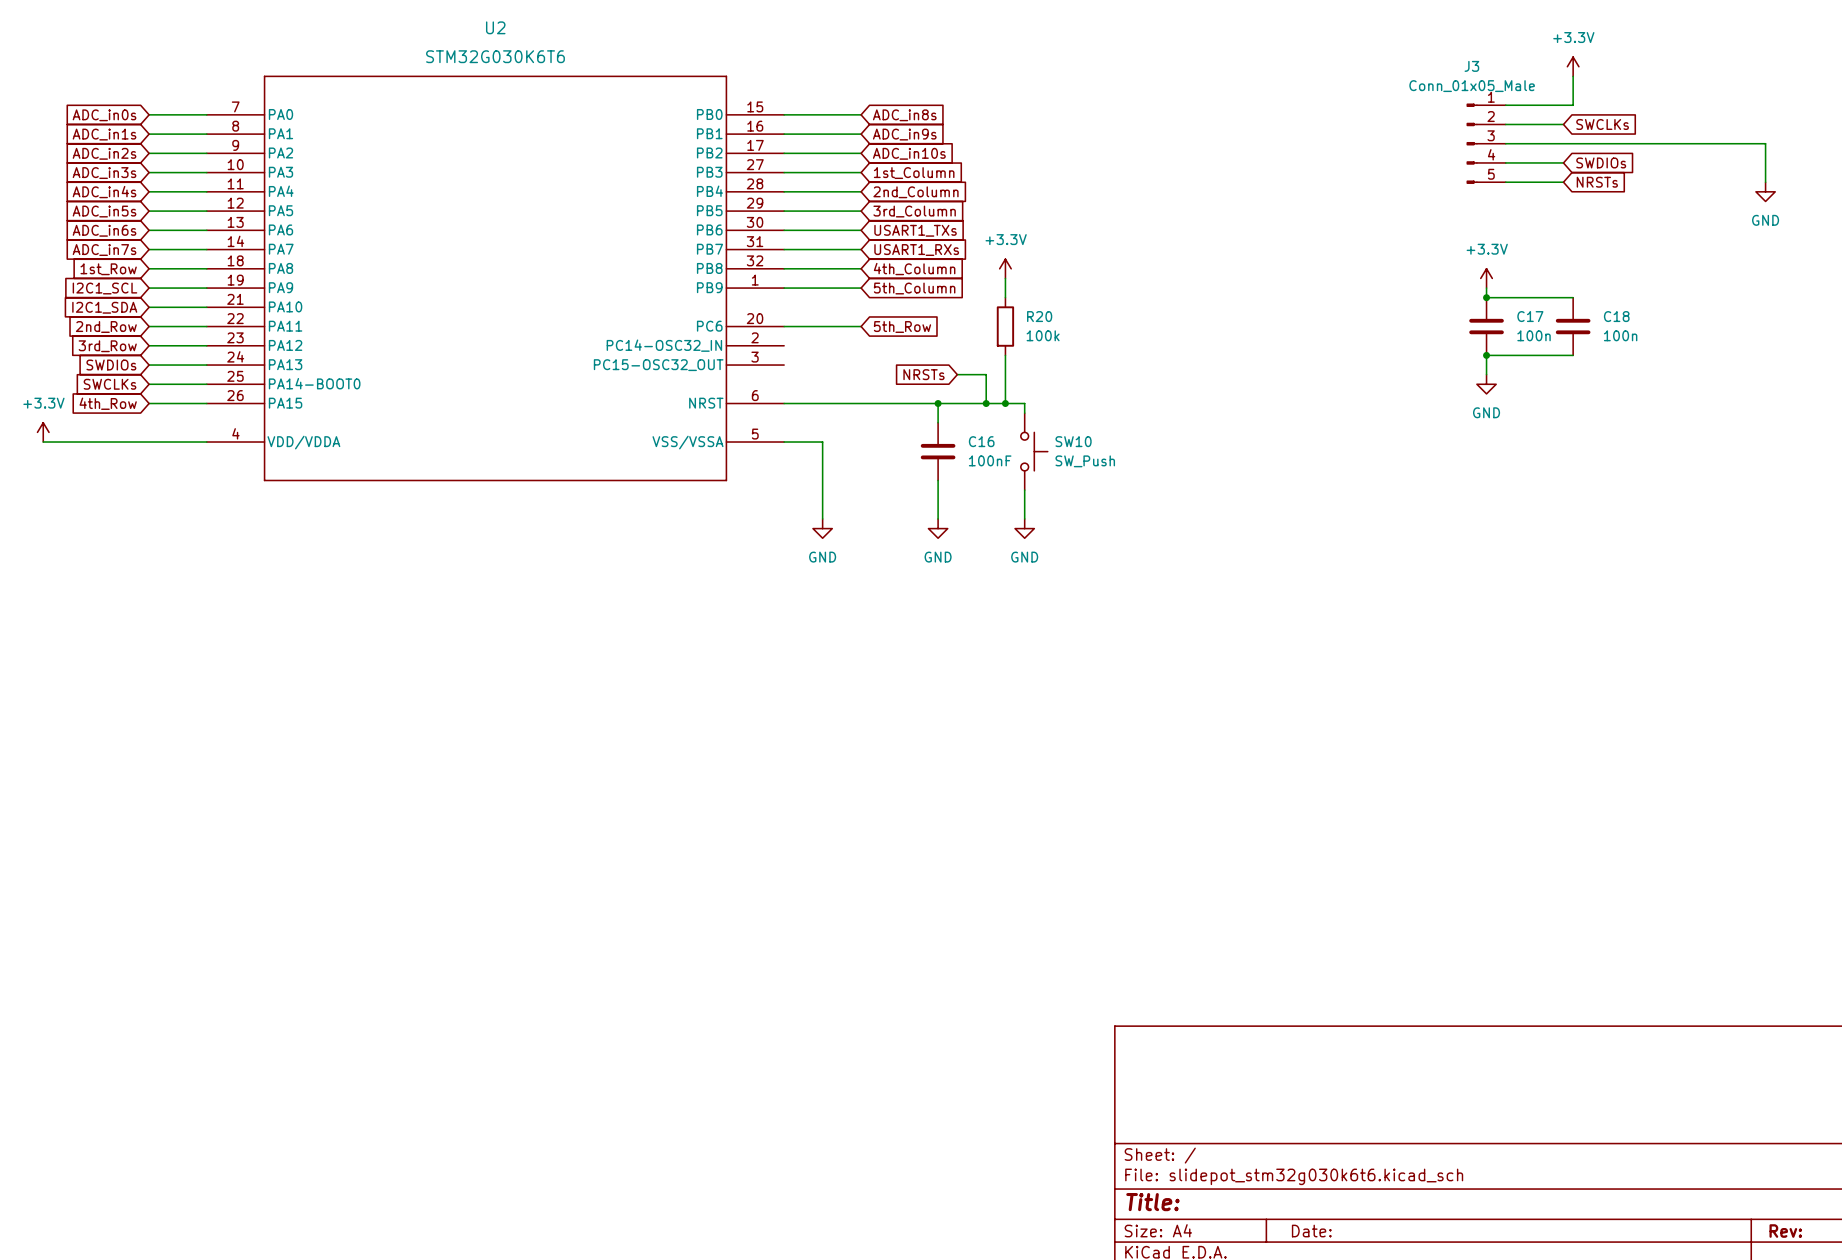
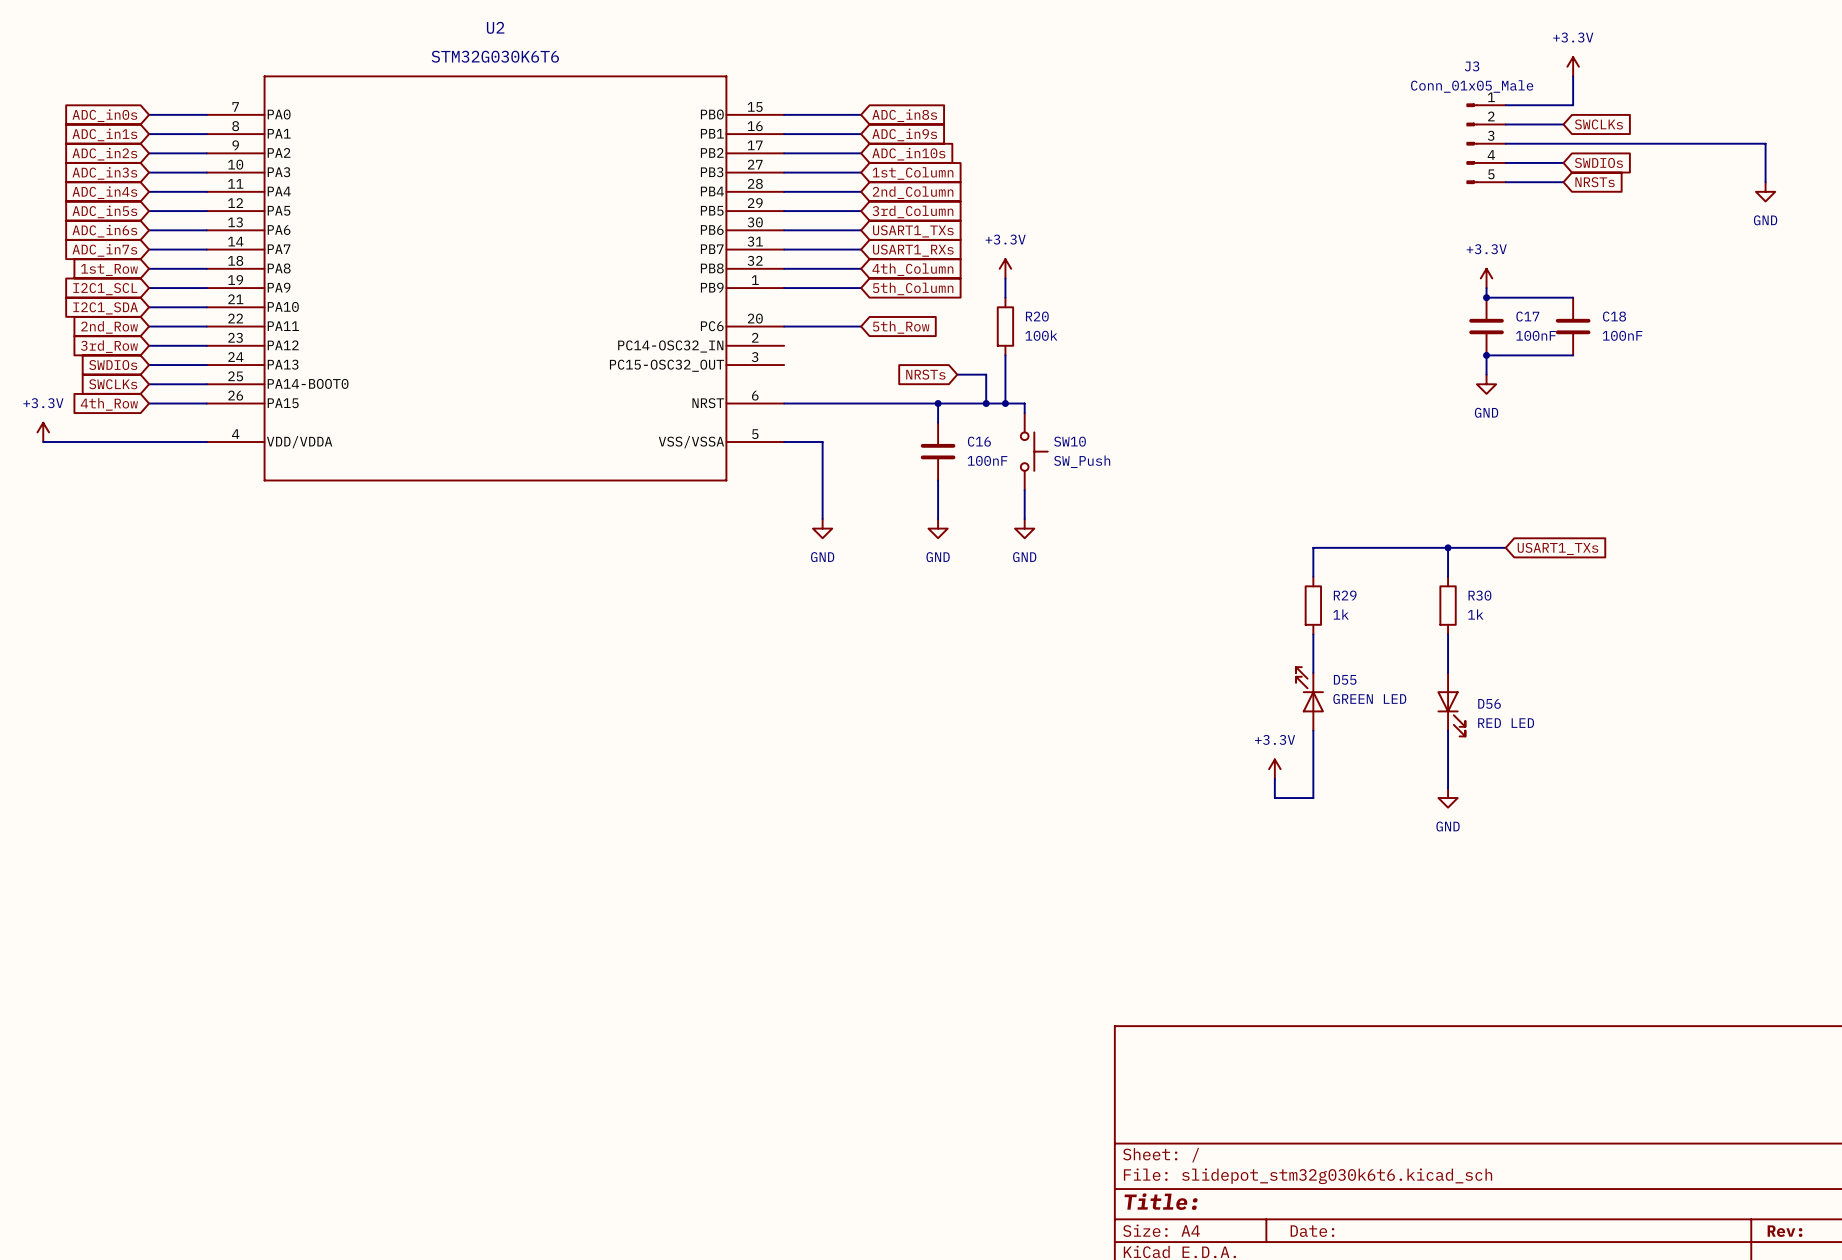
C17 value: 100n (1534, 335) -> 100nF (1535, 335)
C18 value: 100n (1620, 335) -> 100nF (1622, 335)
wire: none -> (1448, 547) (1448, 576)
junction: none -> (1448, 547)
wire: none -> (1505, 547) (1313, 547) (1313, 576)
global label: none -> USART1_TXs (1557, 548)
R29: none -> 1k (1313, 605)
R30: none -> 1k (1448, 605)
wire: none -> (1313, 634) (1313, 672)
wire: none -> (1448, 634) (1448, 672)
D55: none -> GREEN LED (1309, 698)
D56: none -> RED LED (1451, 704)
wire: none -> (1313, 730) (1313, 798) (1274, 798) (1274, 778)
wire: none -> (1448, 730) (1448, 788)
power symbol: none -> +3.3V (1274, 769)
power symbol: none -> GND (1448, 798)

